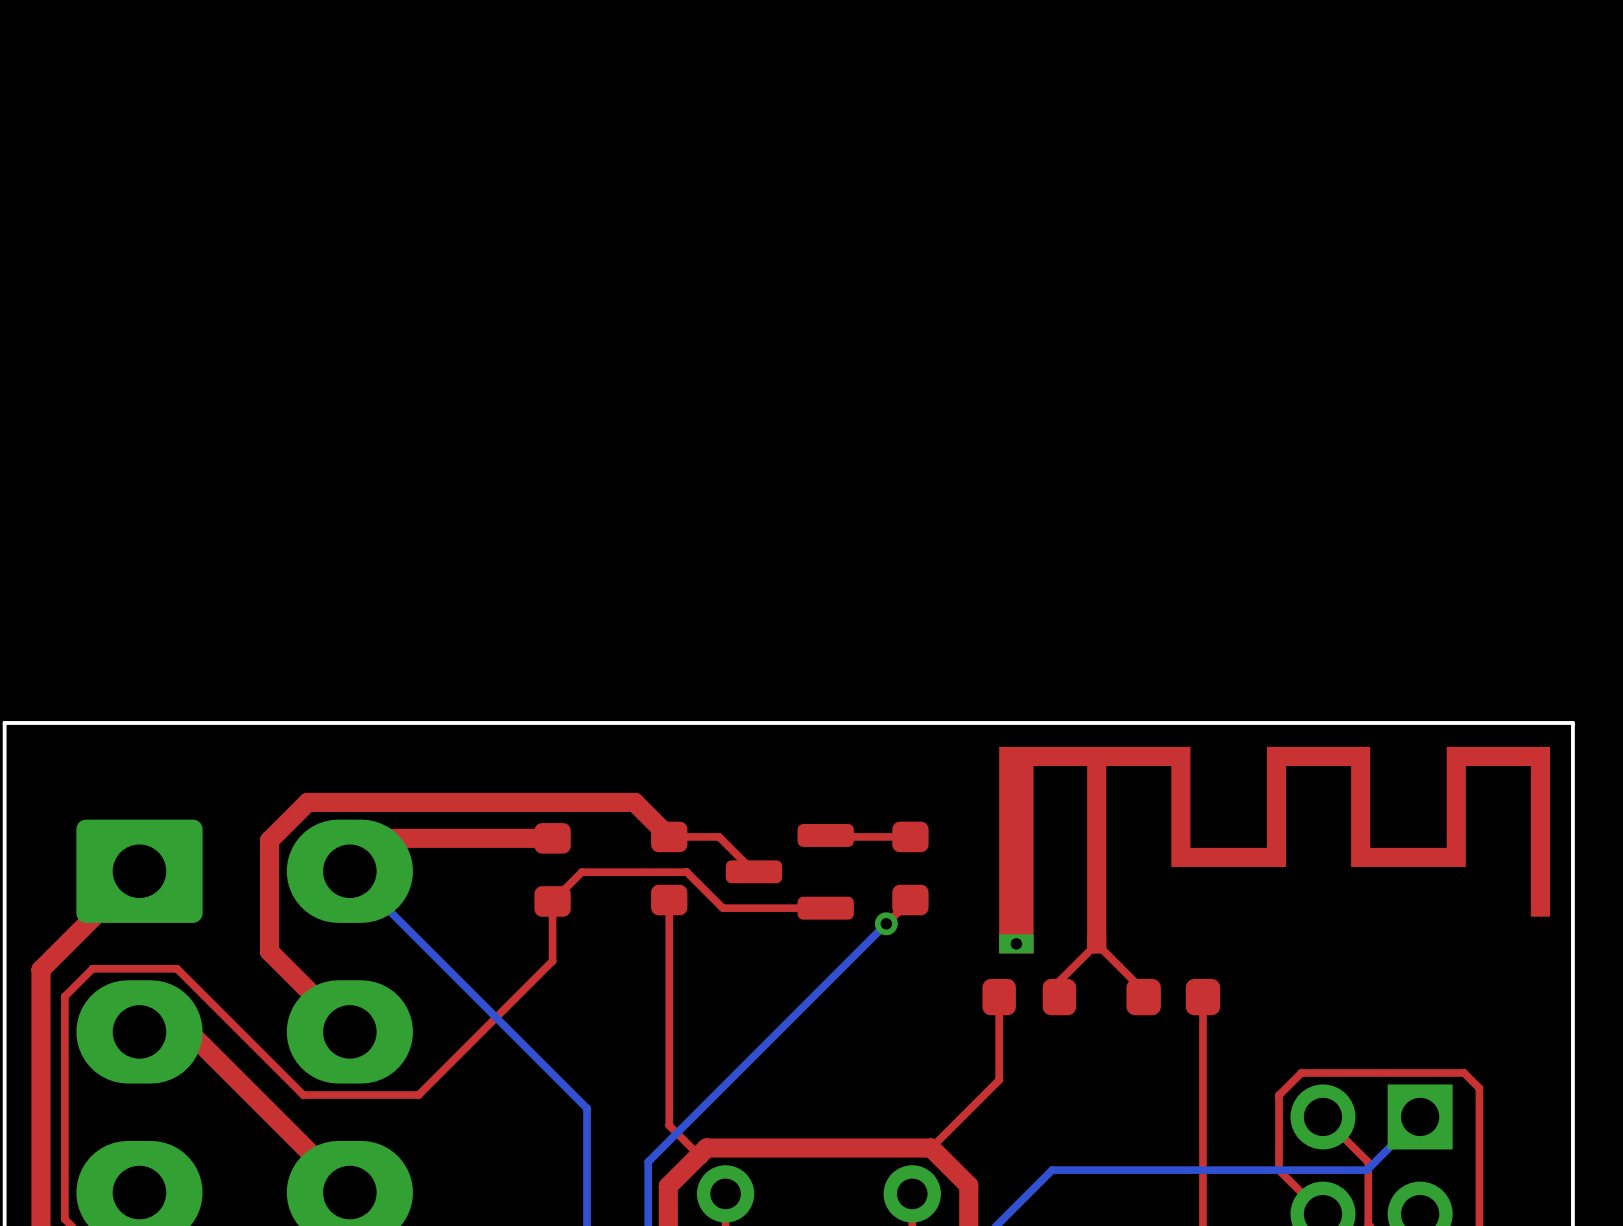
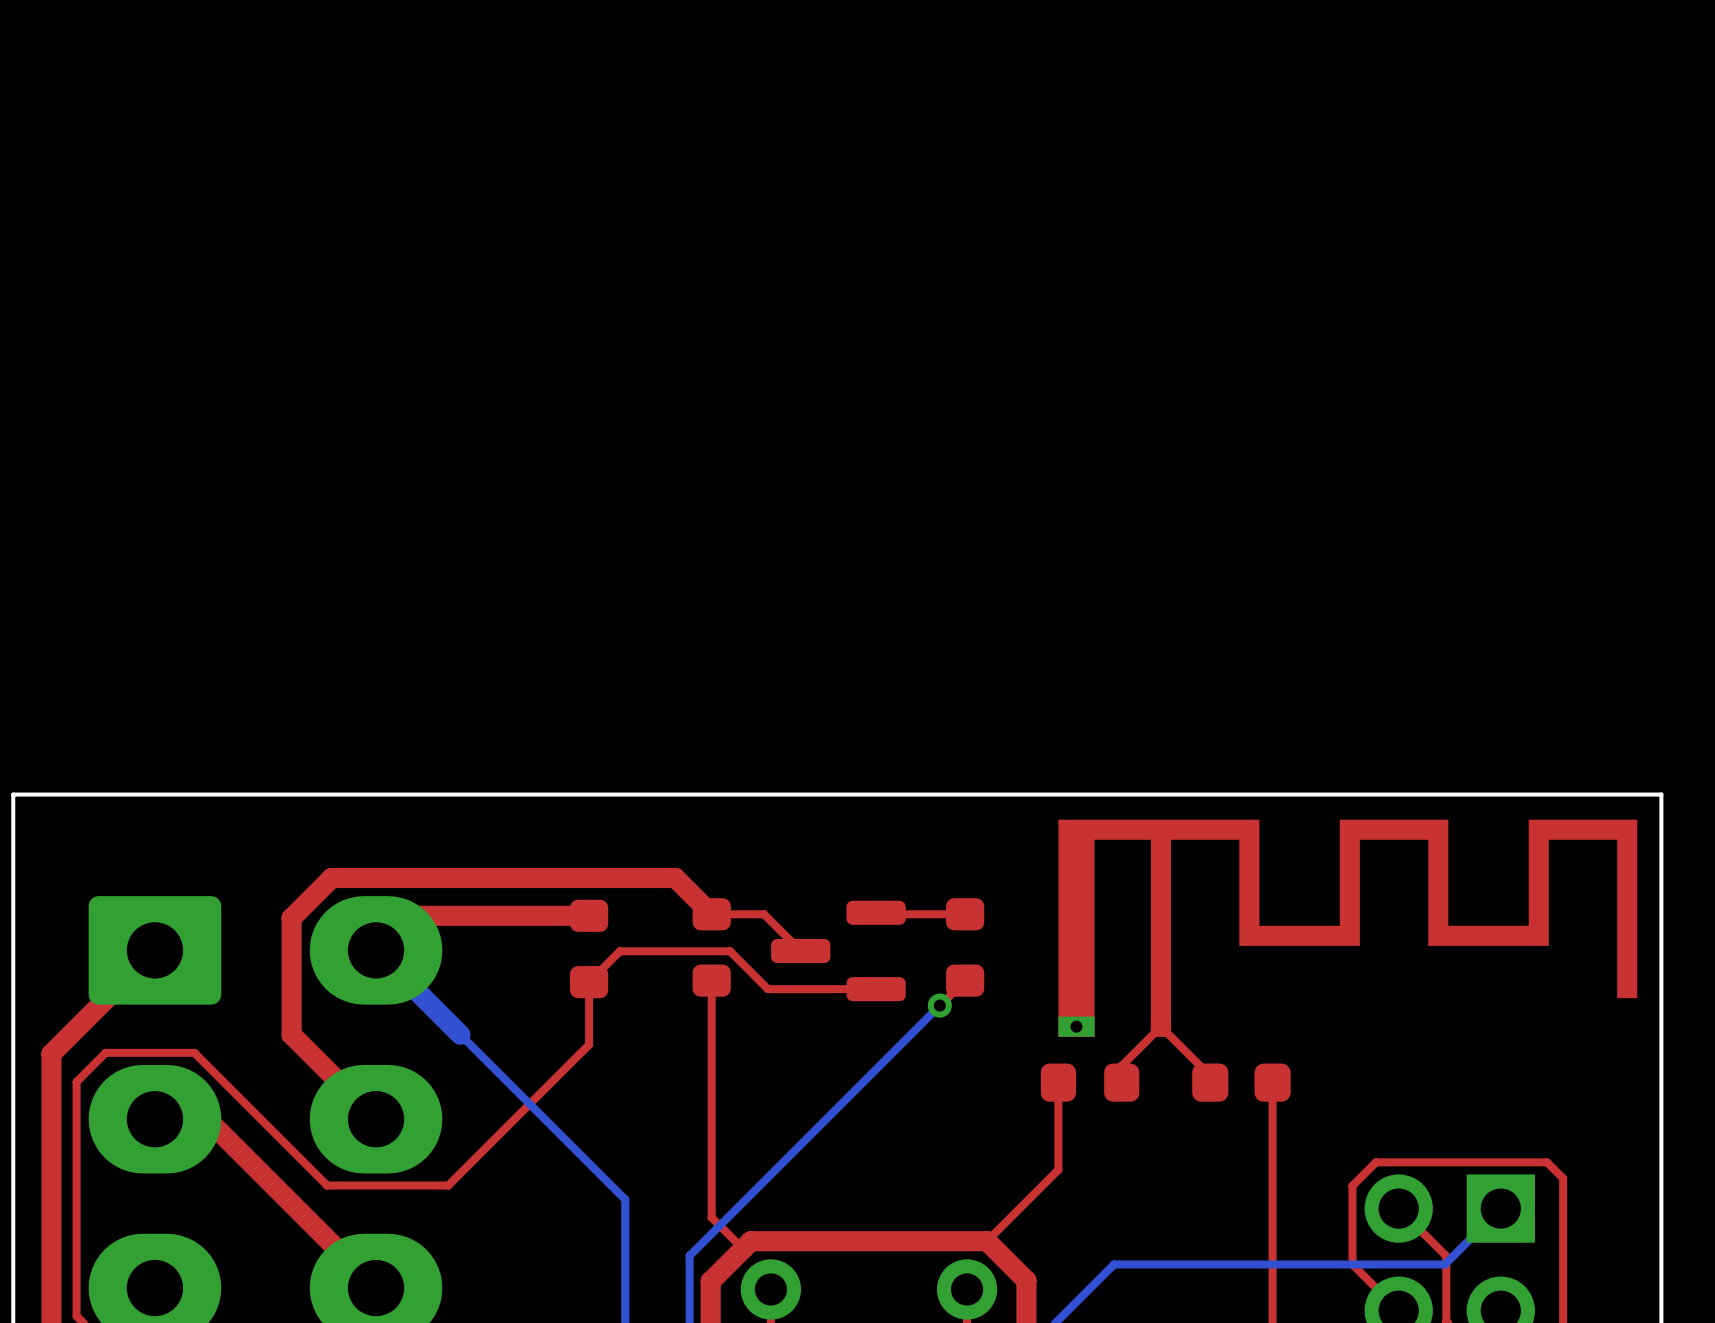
bottom track width: thin (349, 871) (430, 951) -> thick (376, 950) (460, 1034)

